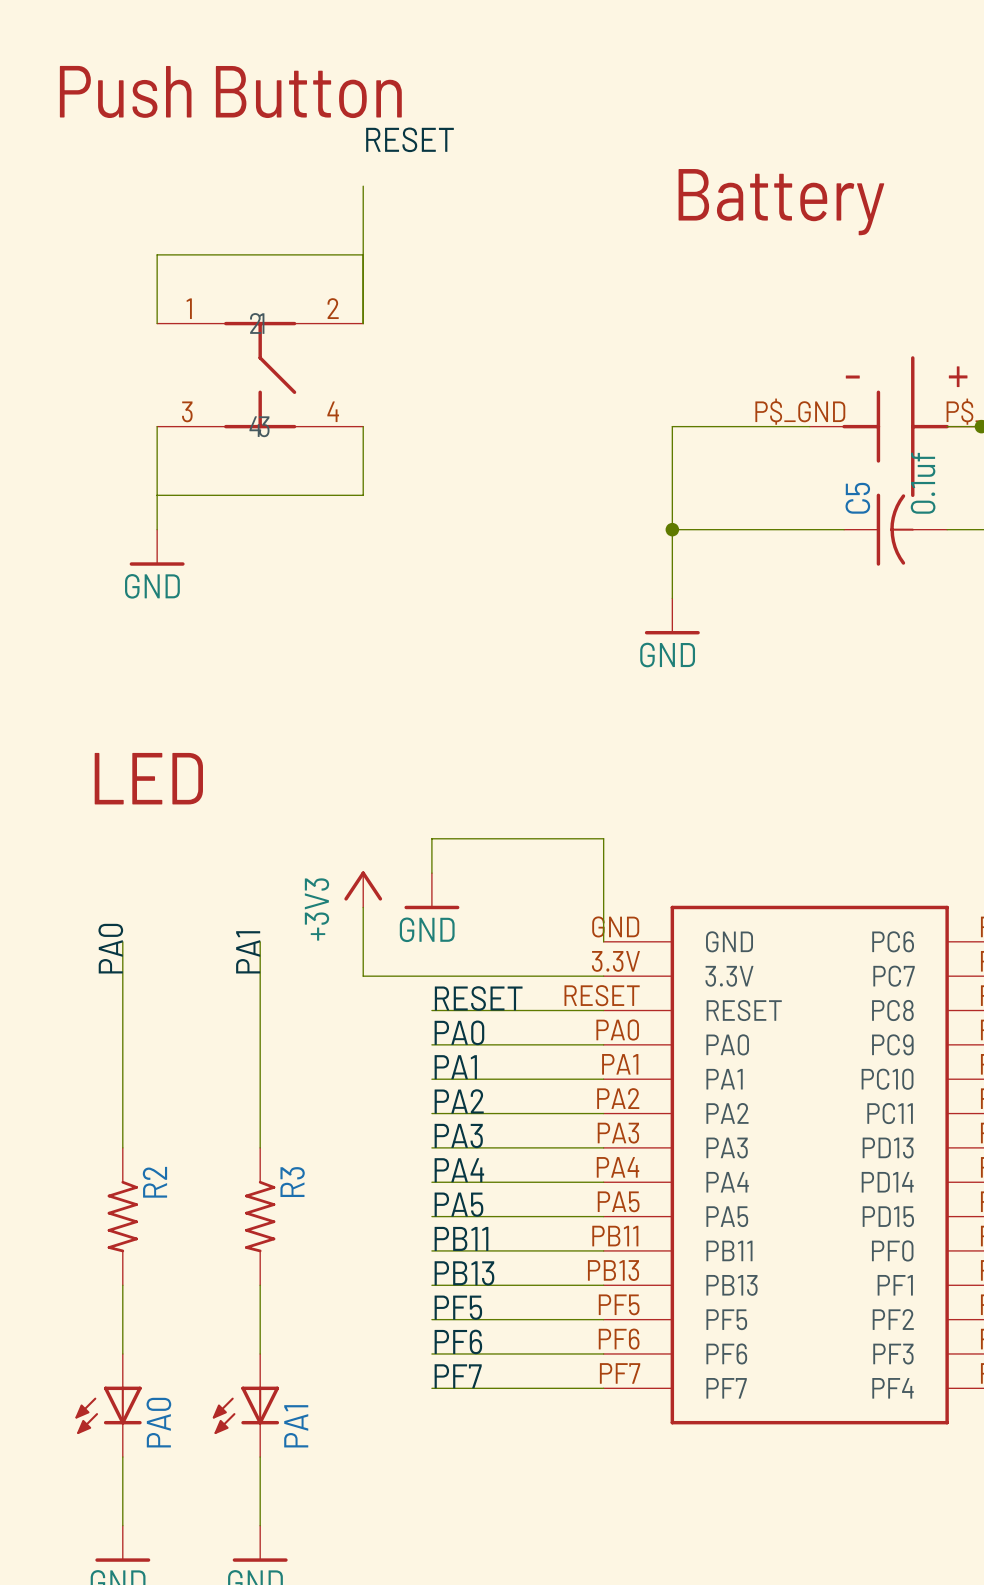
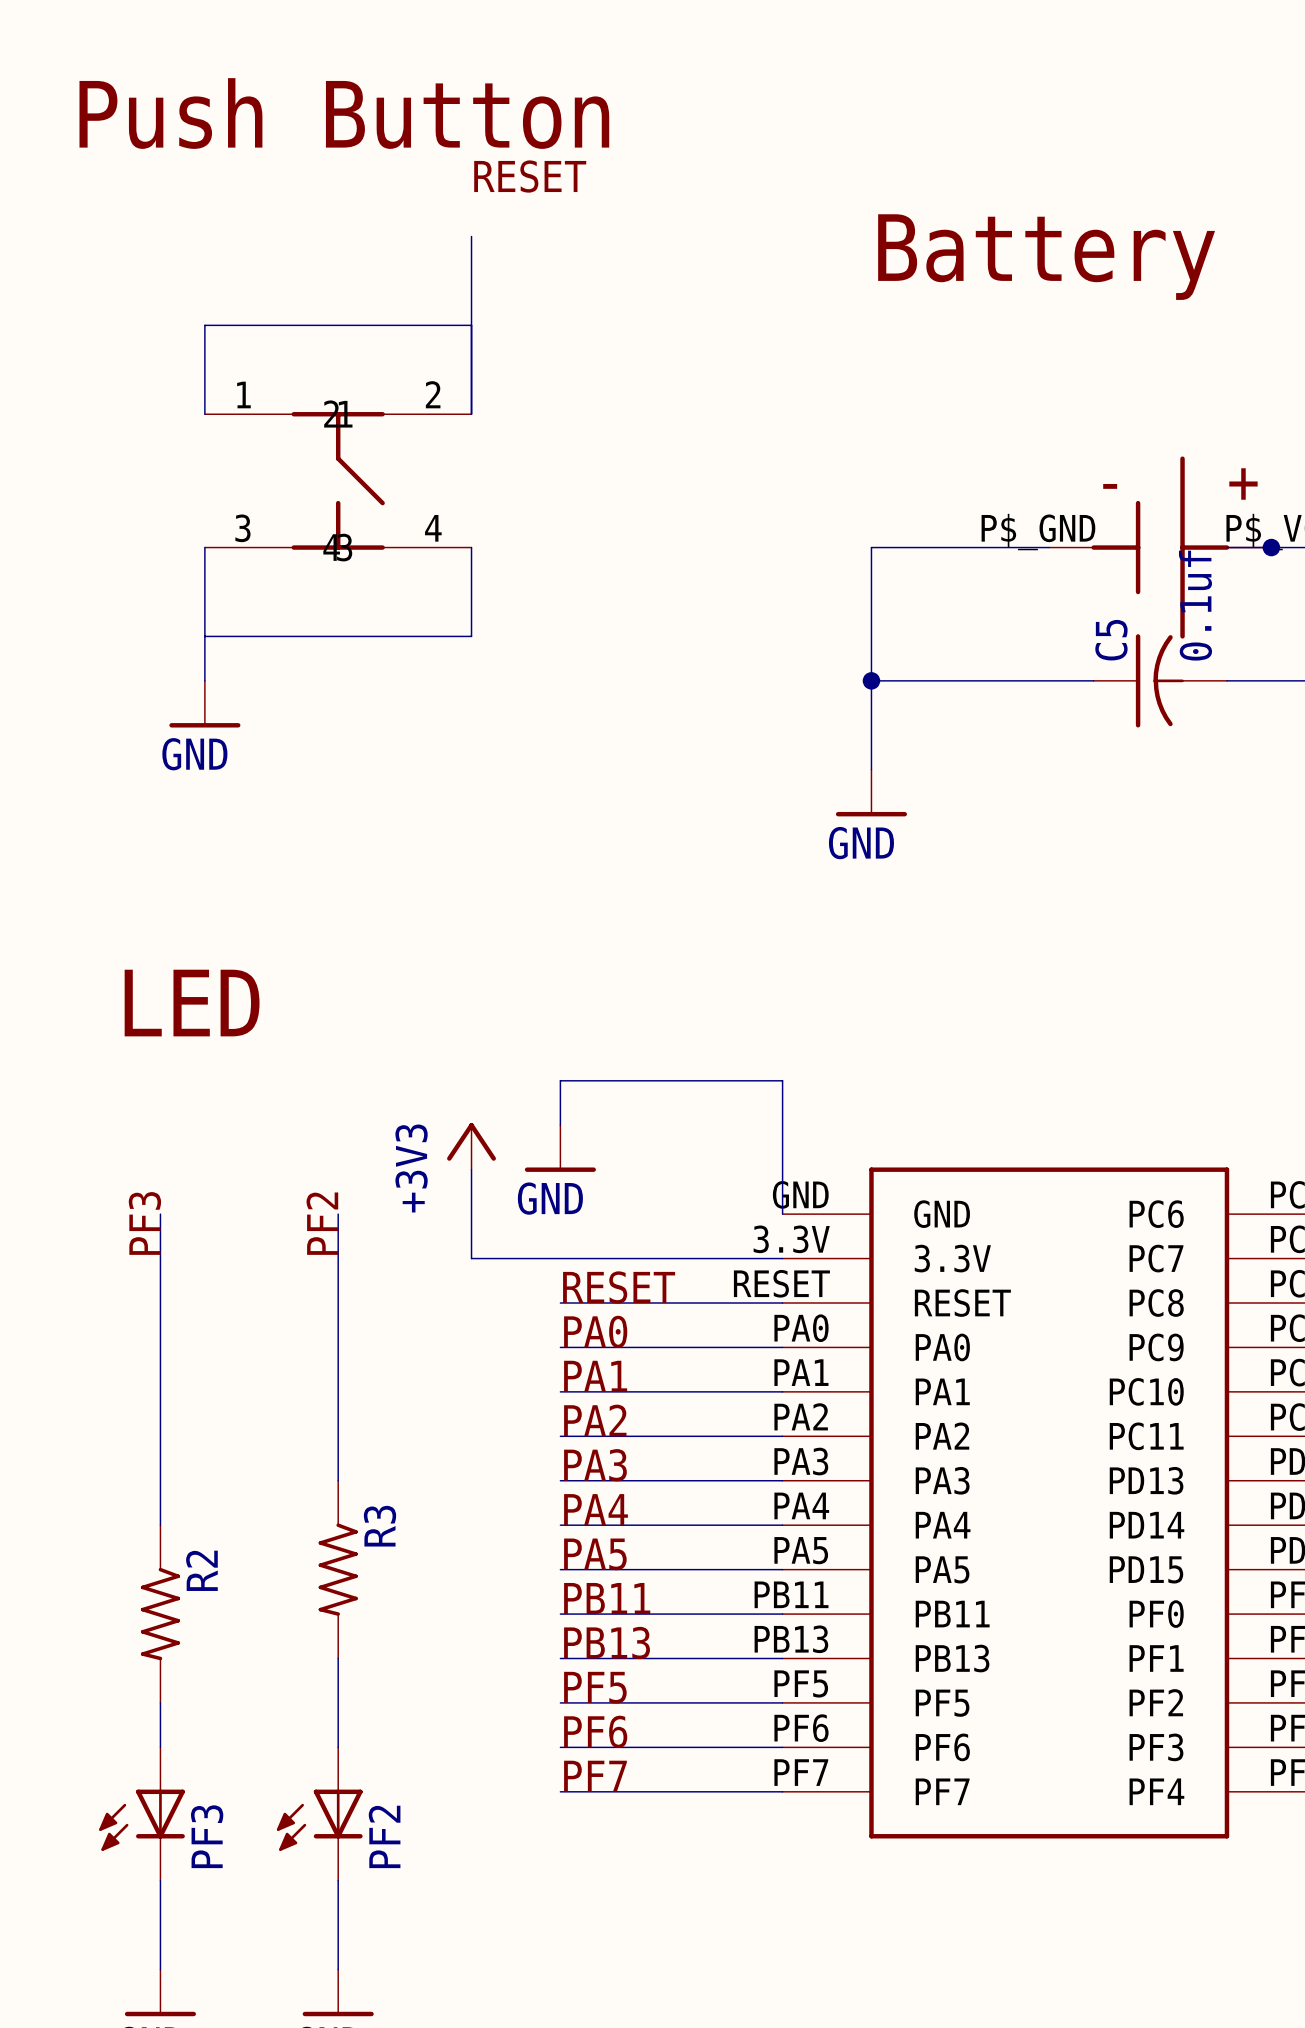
label: PA0 (110, 948) -> PF3 (144, 1223)
label: PA1 (248, 952) -> PF2 (322, 1223)
R2 position: (122, 1216) -> (160, 1614)
PA0 name: PA0 (158, 1422) -> PF3 (207, 1836)
PA1 name: PA1 (296, 1426) -> PF2 (384, 1836)

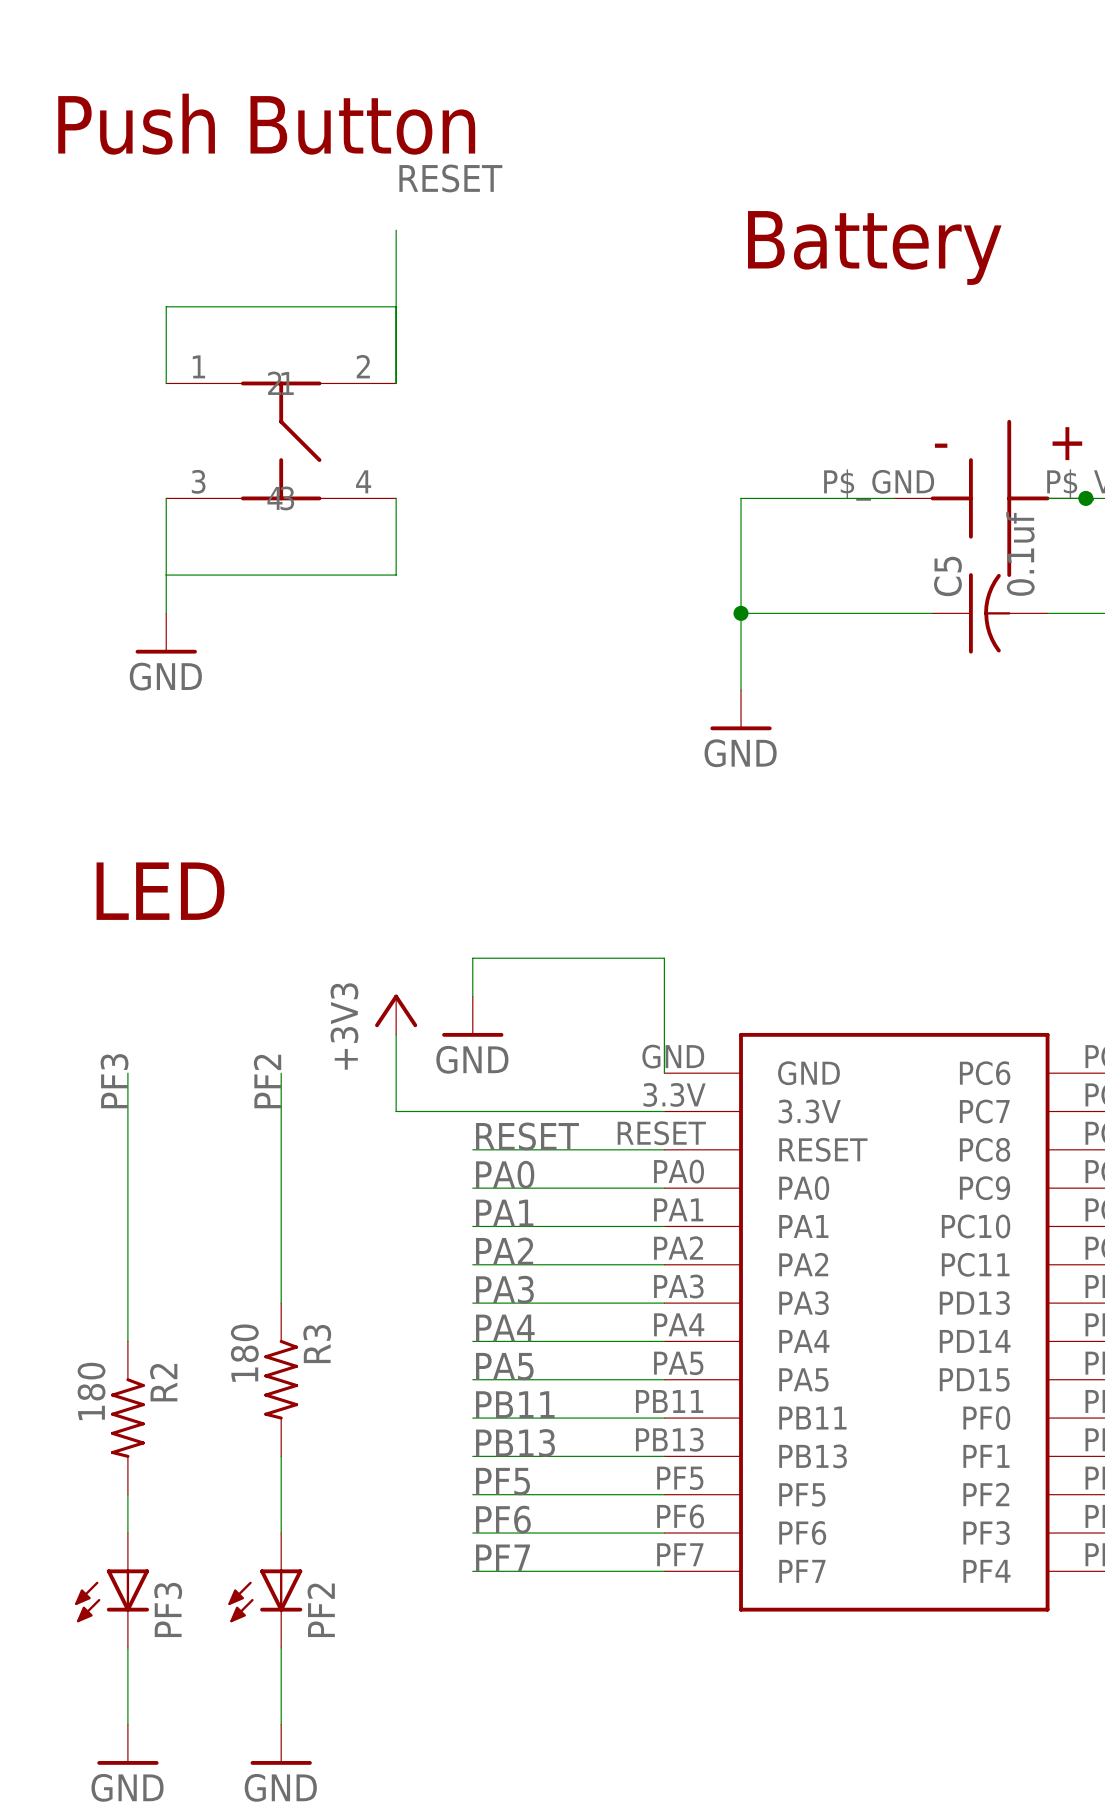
R3 value: none -> 180 (244, 1353)
R2 value: none -> 180 (91, 1391)

